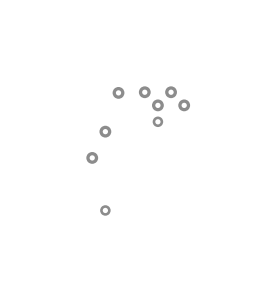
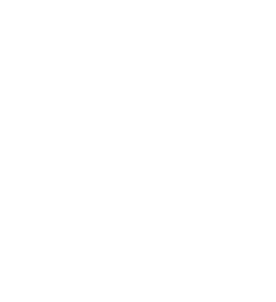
via: (118, 92) -> none
via: (144, 92) -> none
via: (171, 92) -> none
via: (157, 105) -> none
via: (184, 105) -> none
via: (157, 121) -> none
via: (105, 131) -> none
via: (92, 157) -> none
via: (105, 210) -> none

